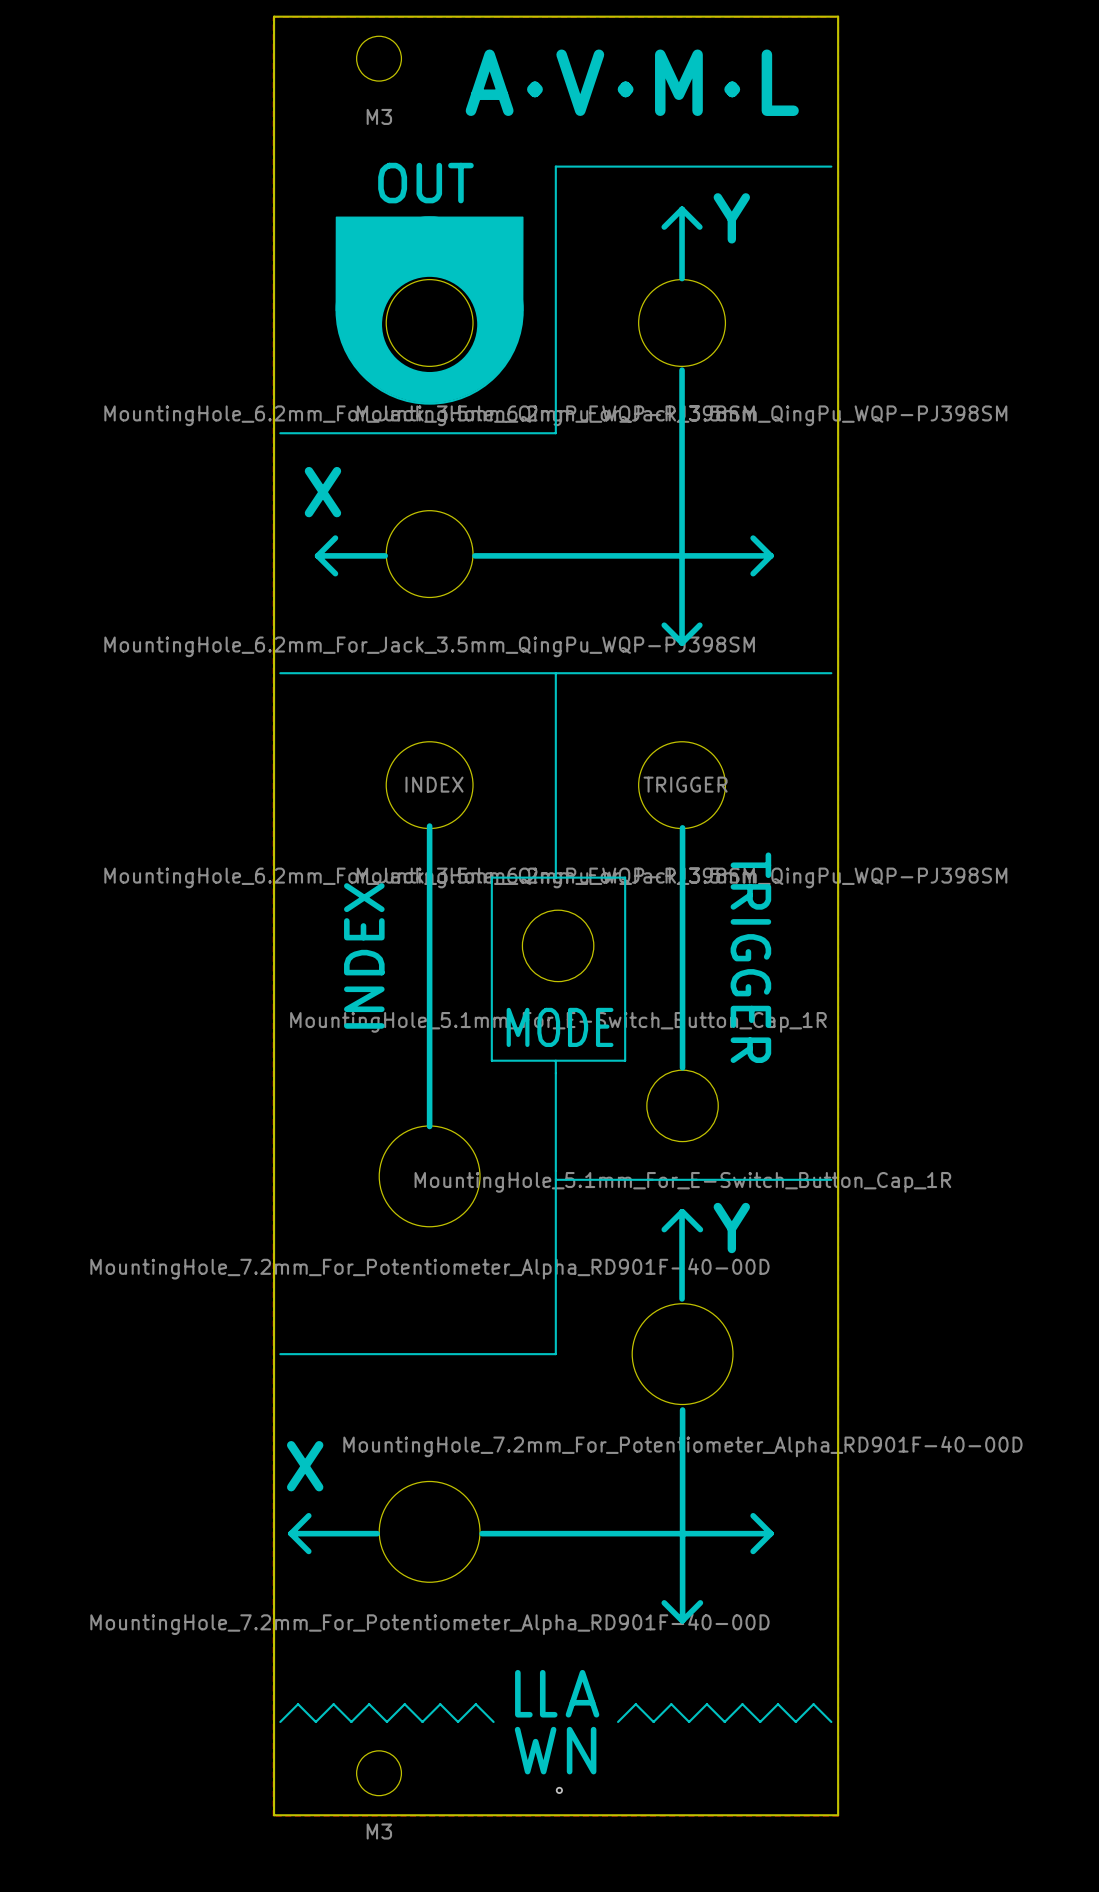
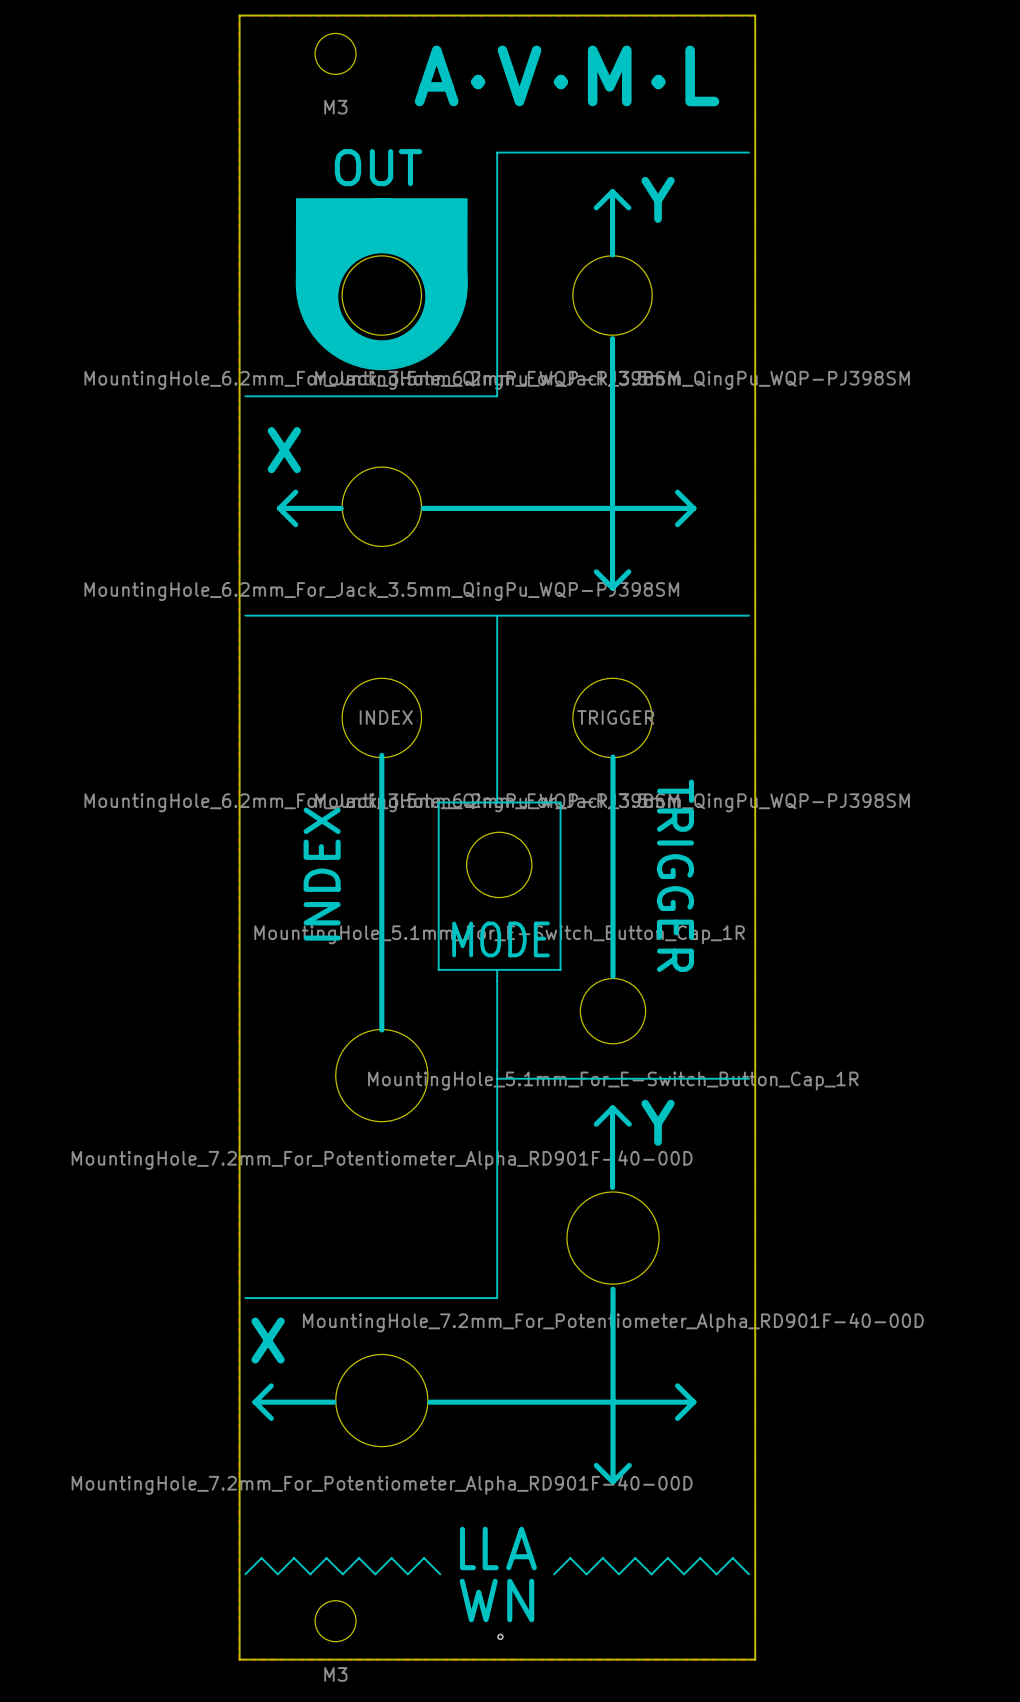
line: (280, 1354) (555, 1354) -> (245, 1298) (497, 1298) (497, 1238)

